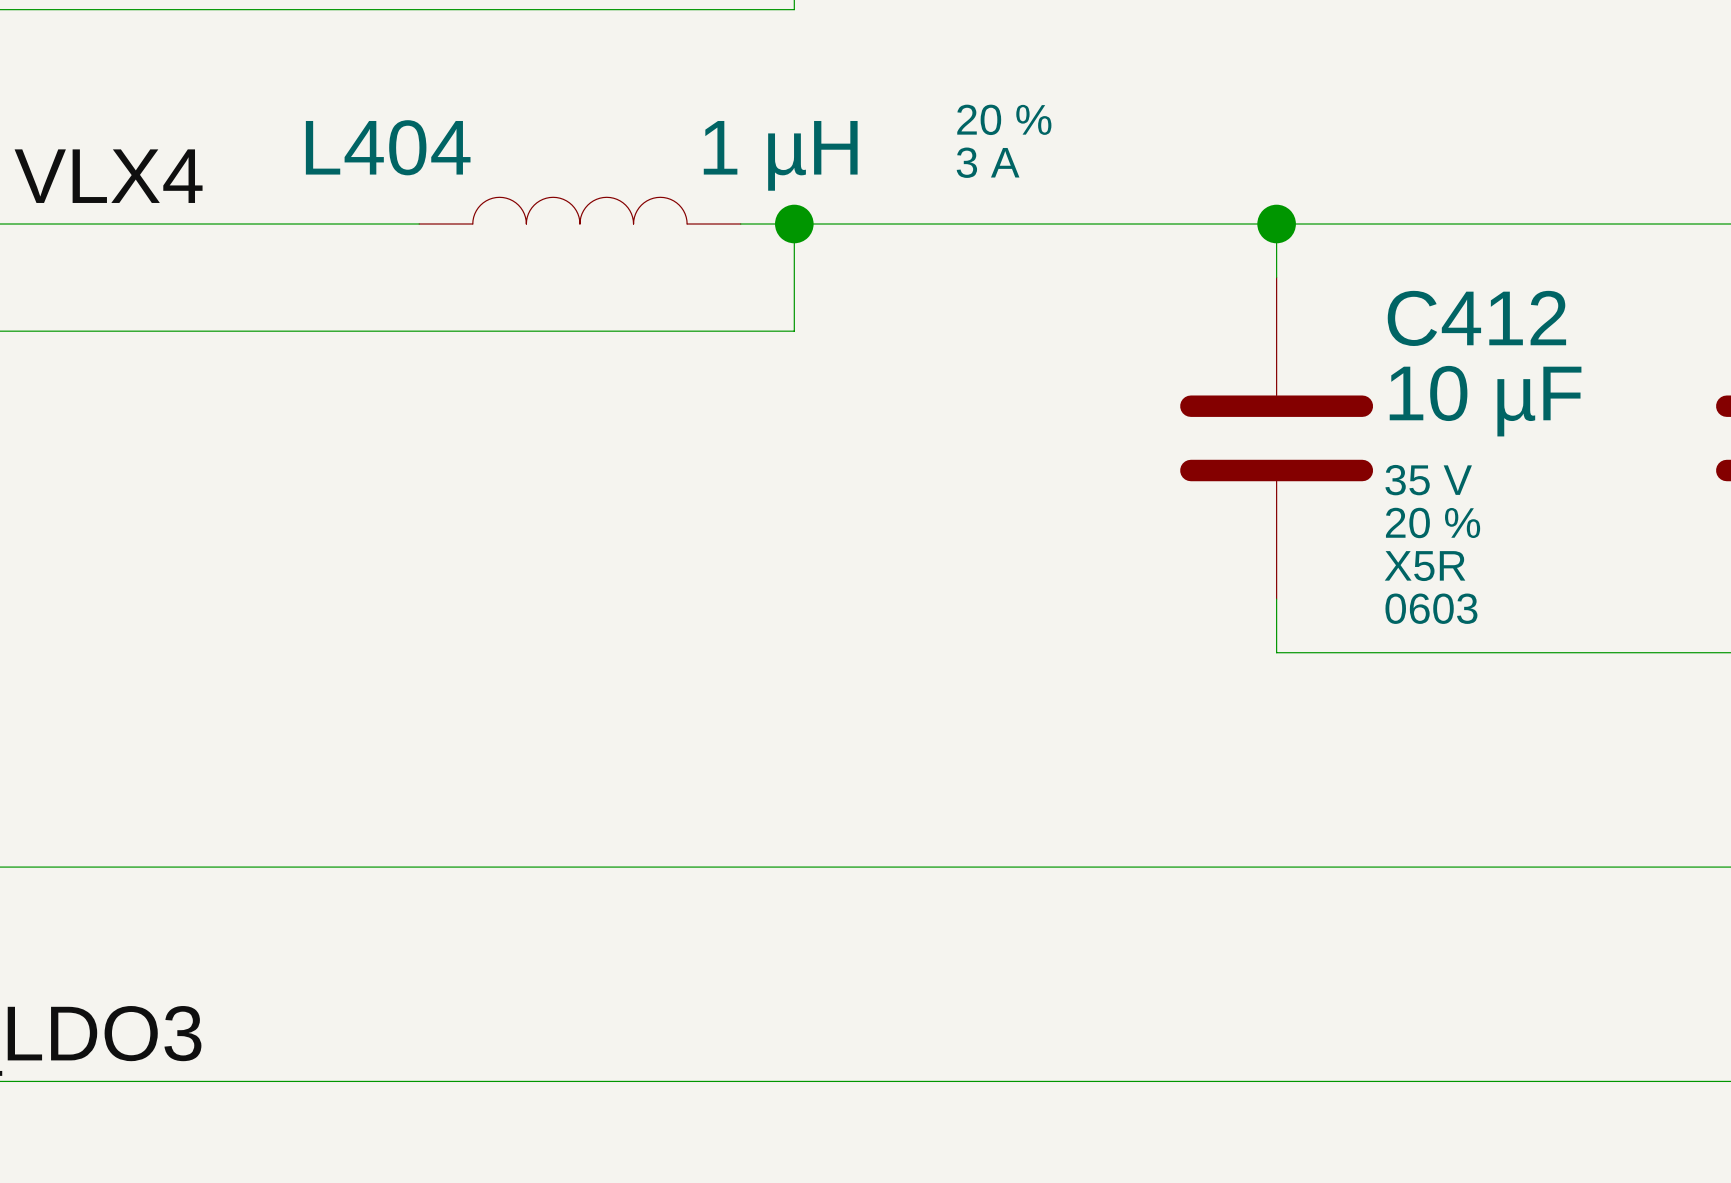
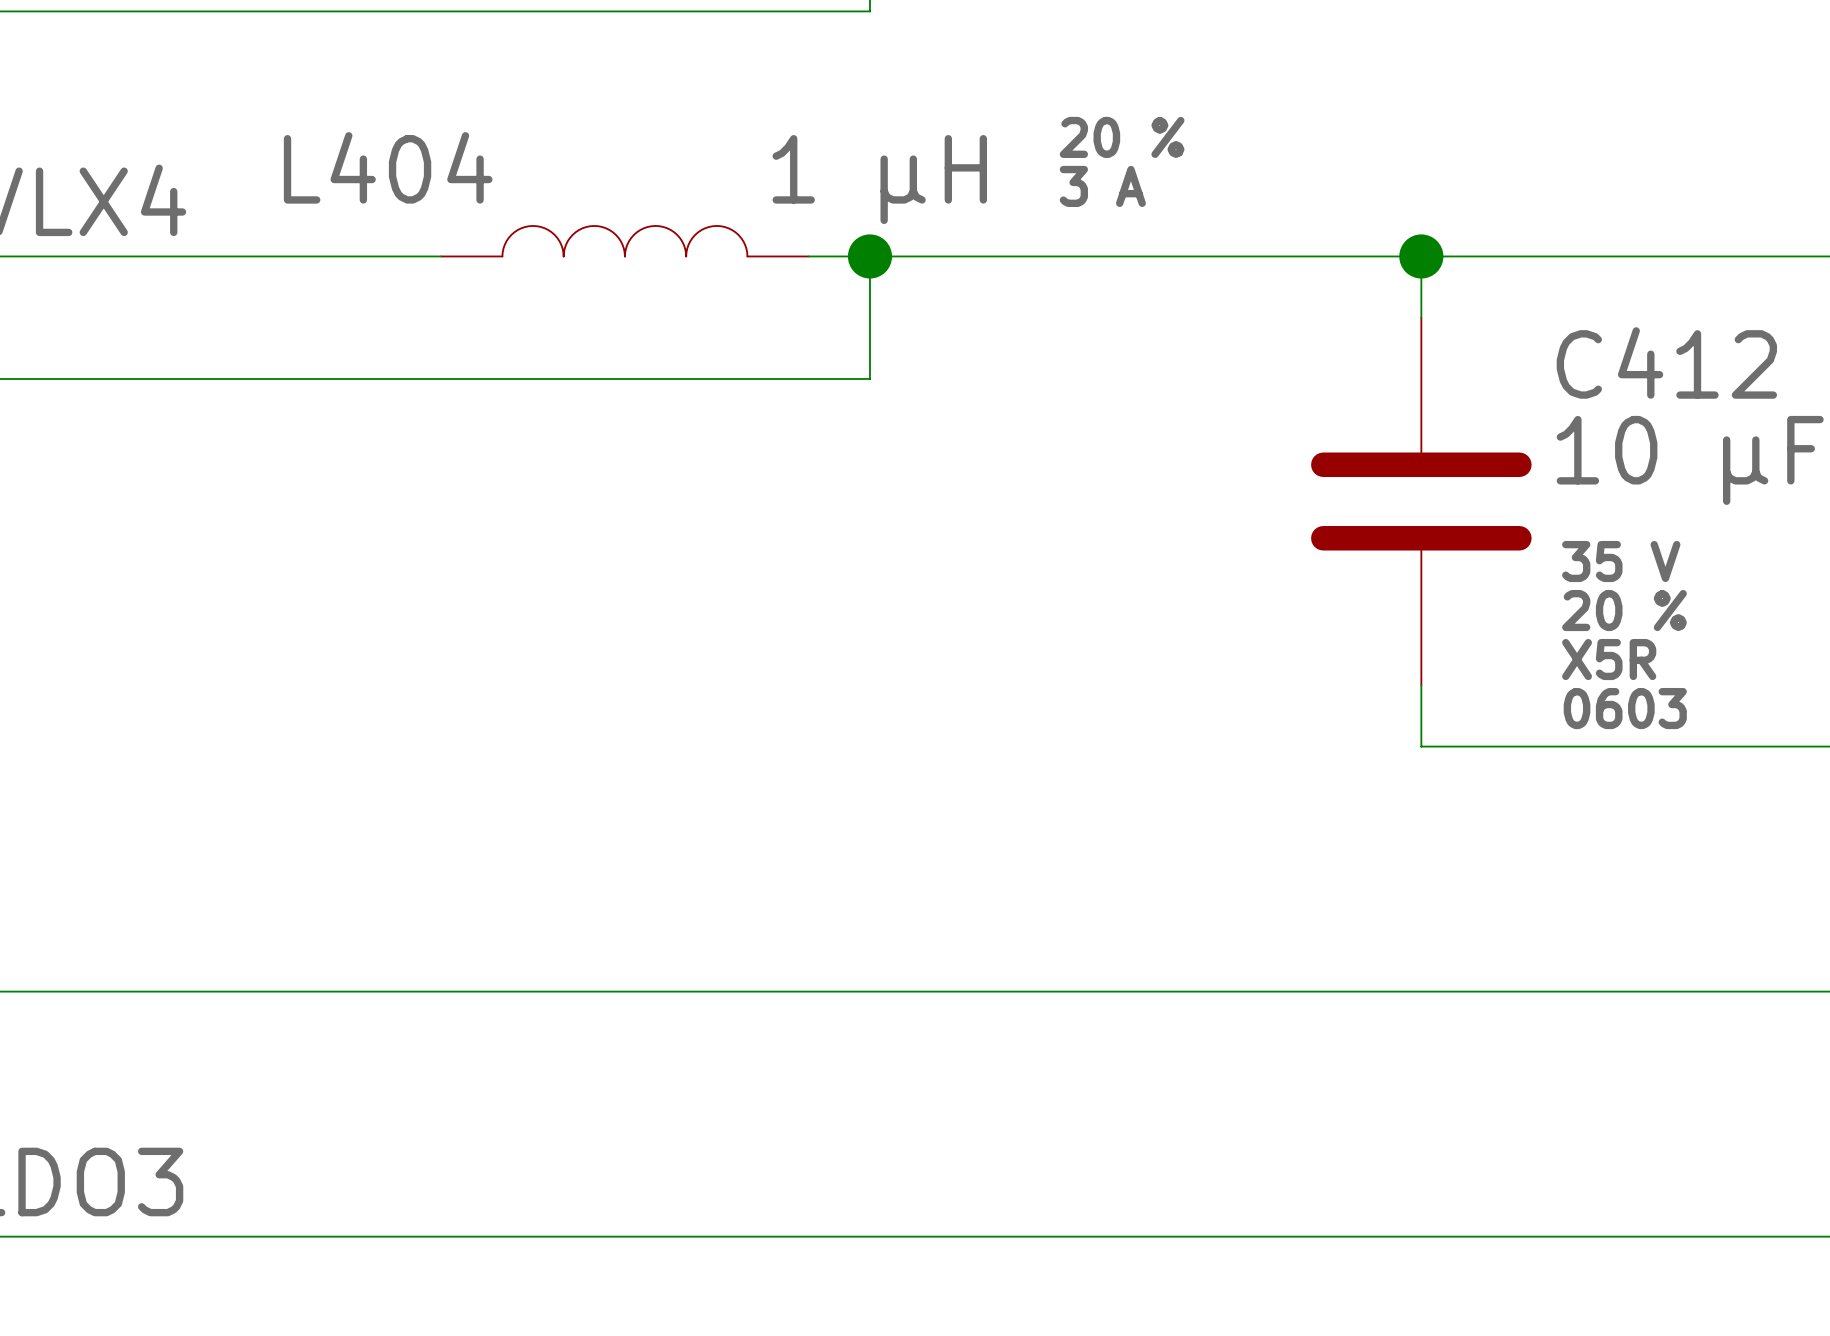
C412 text position: 35 V (1428, 480) -> 35 V (1621, 561)
C412 text position: 20 % (1433, 522) -> 20 % (1624, 610)
C412 text position: X5R (1425, 566) -> X5R (1609, 659)
C412 text position: 0603 (1431, 608) -> 0603 (1625, 708)

